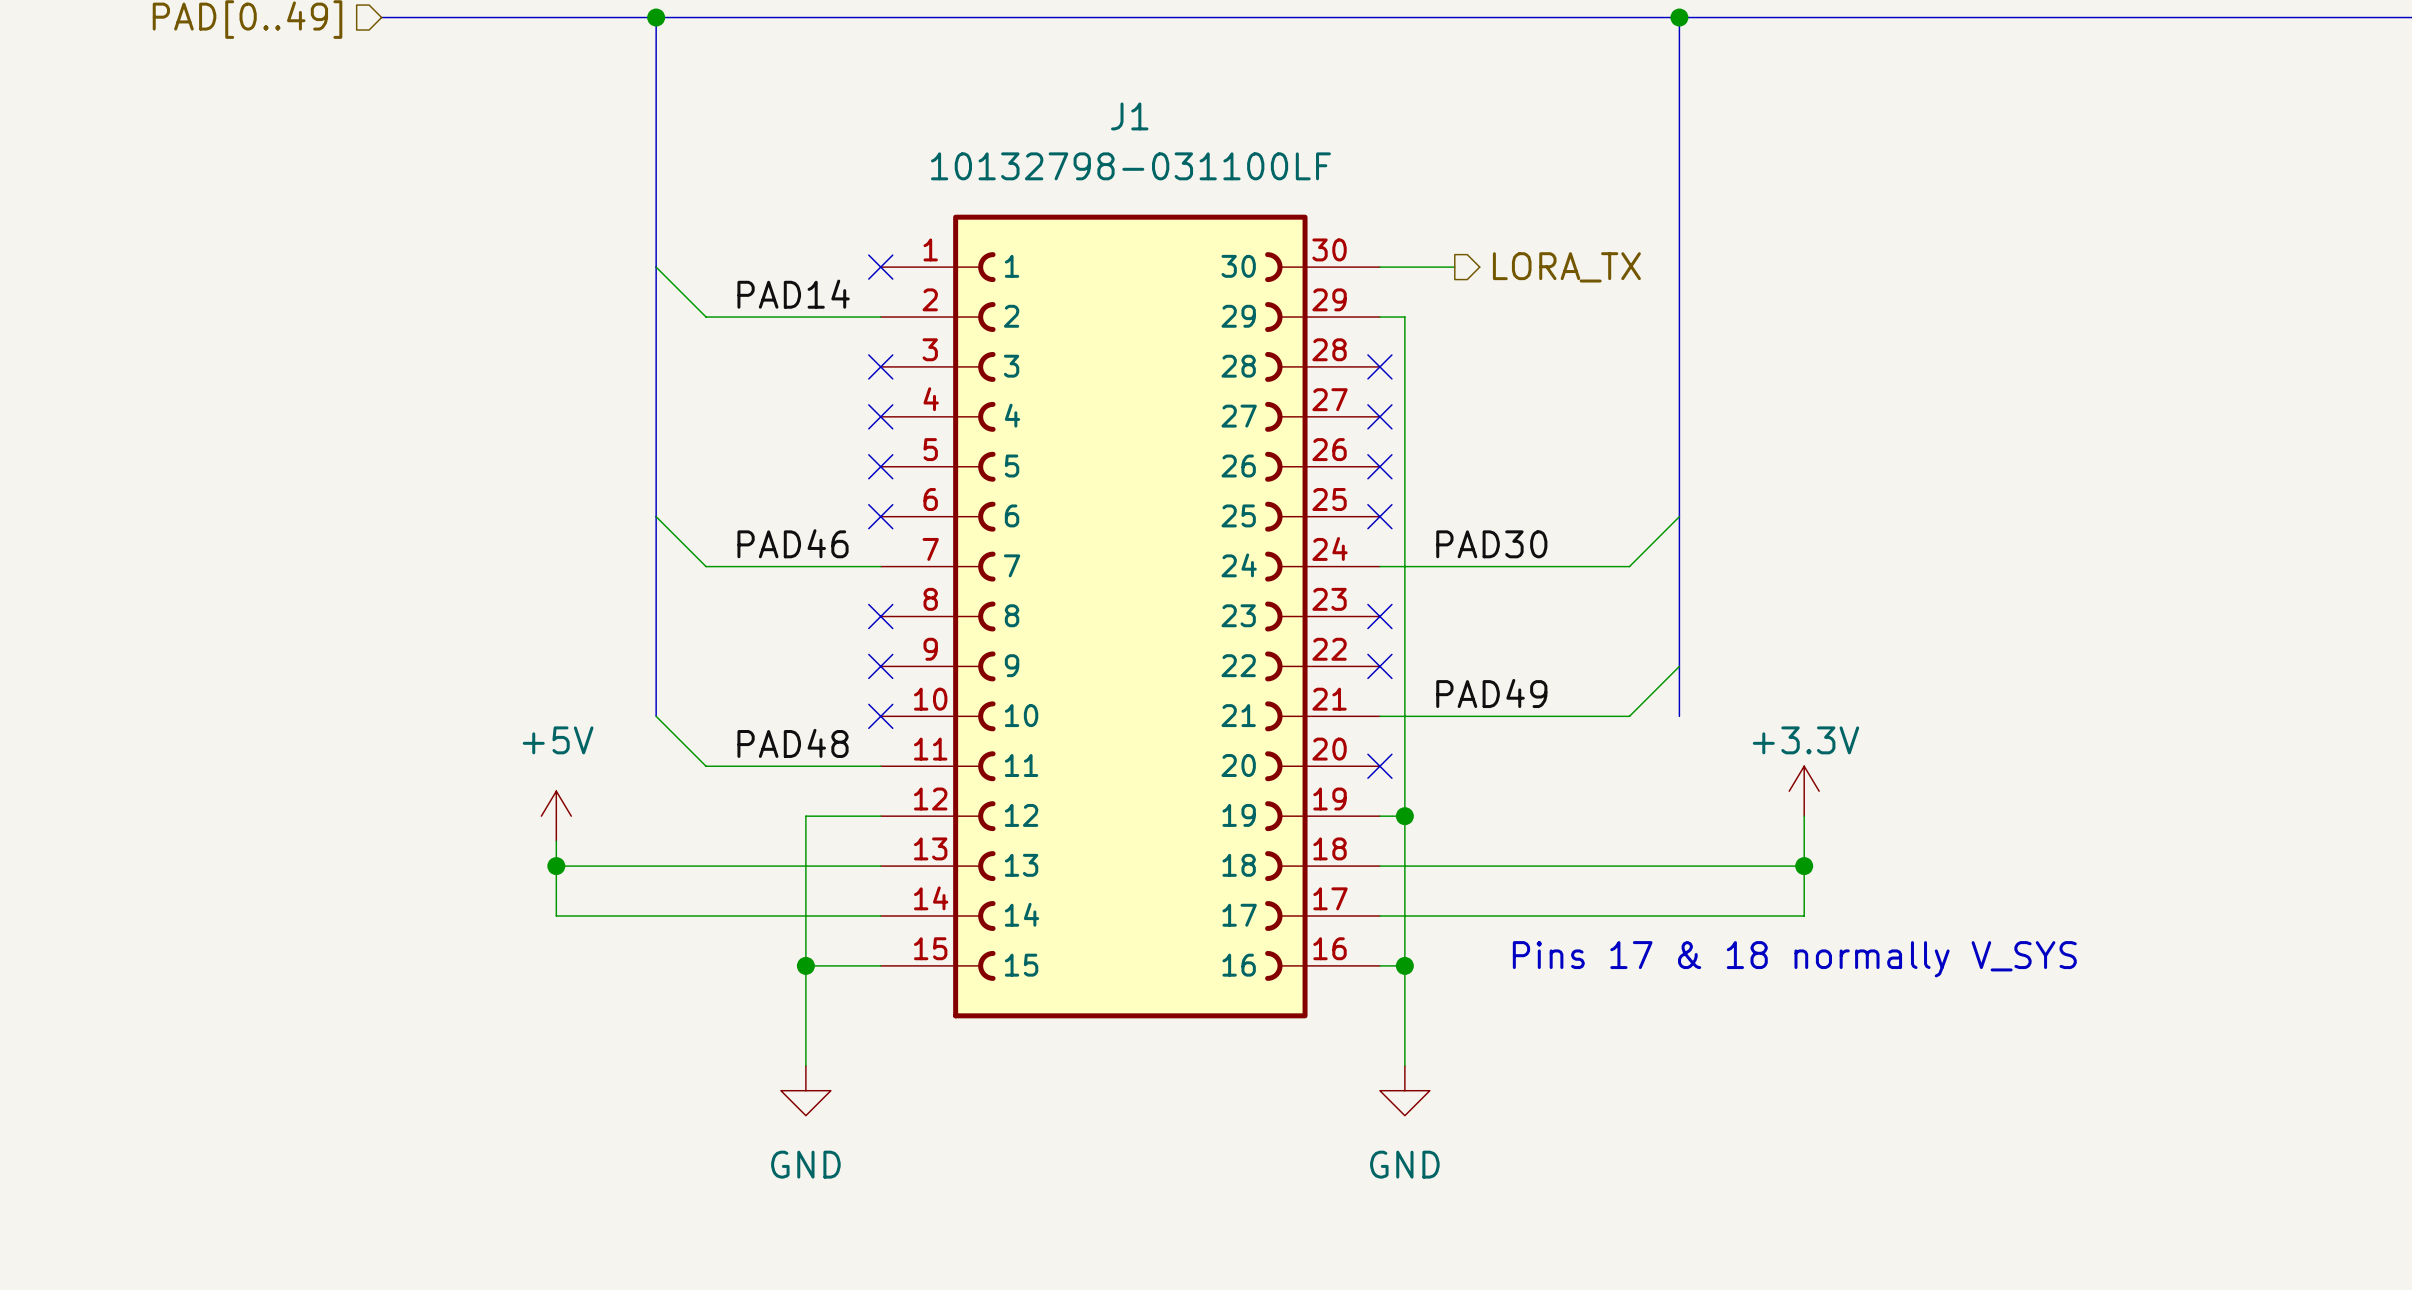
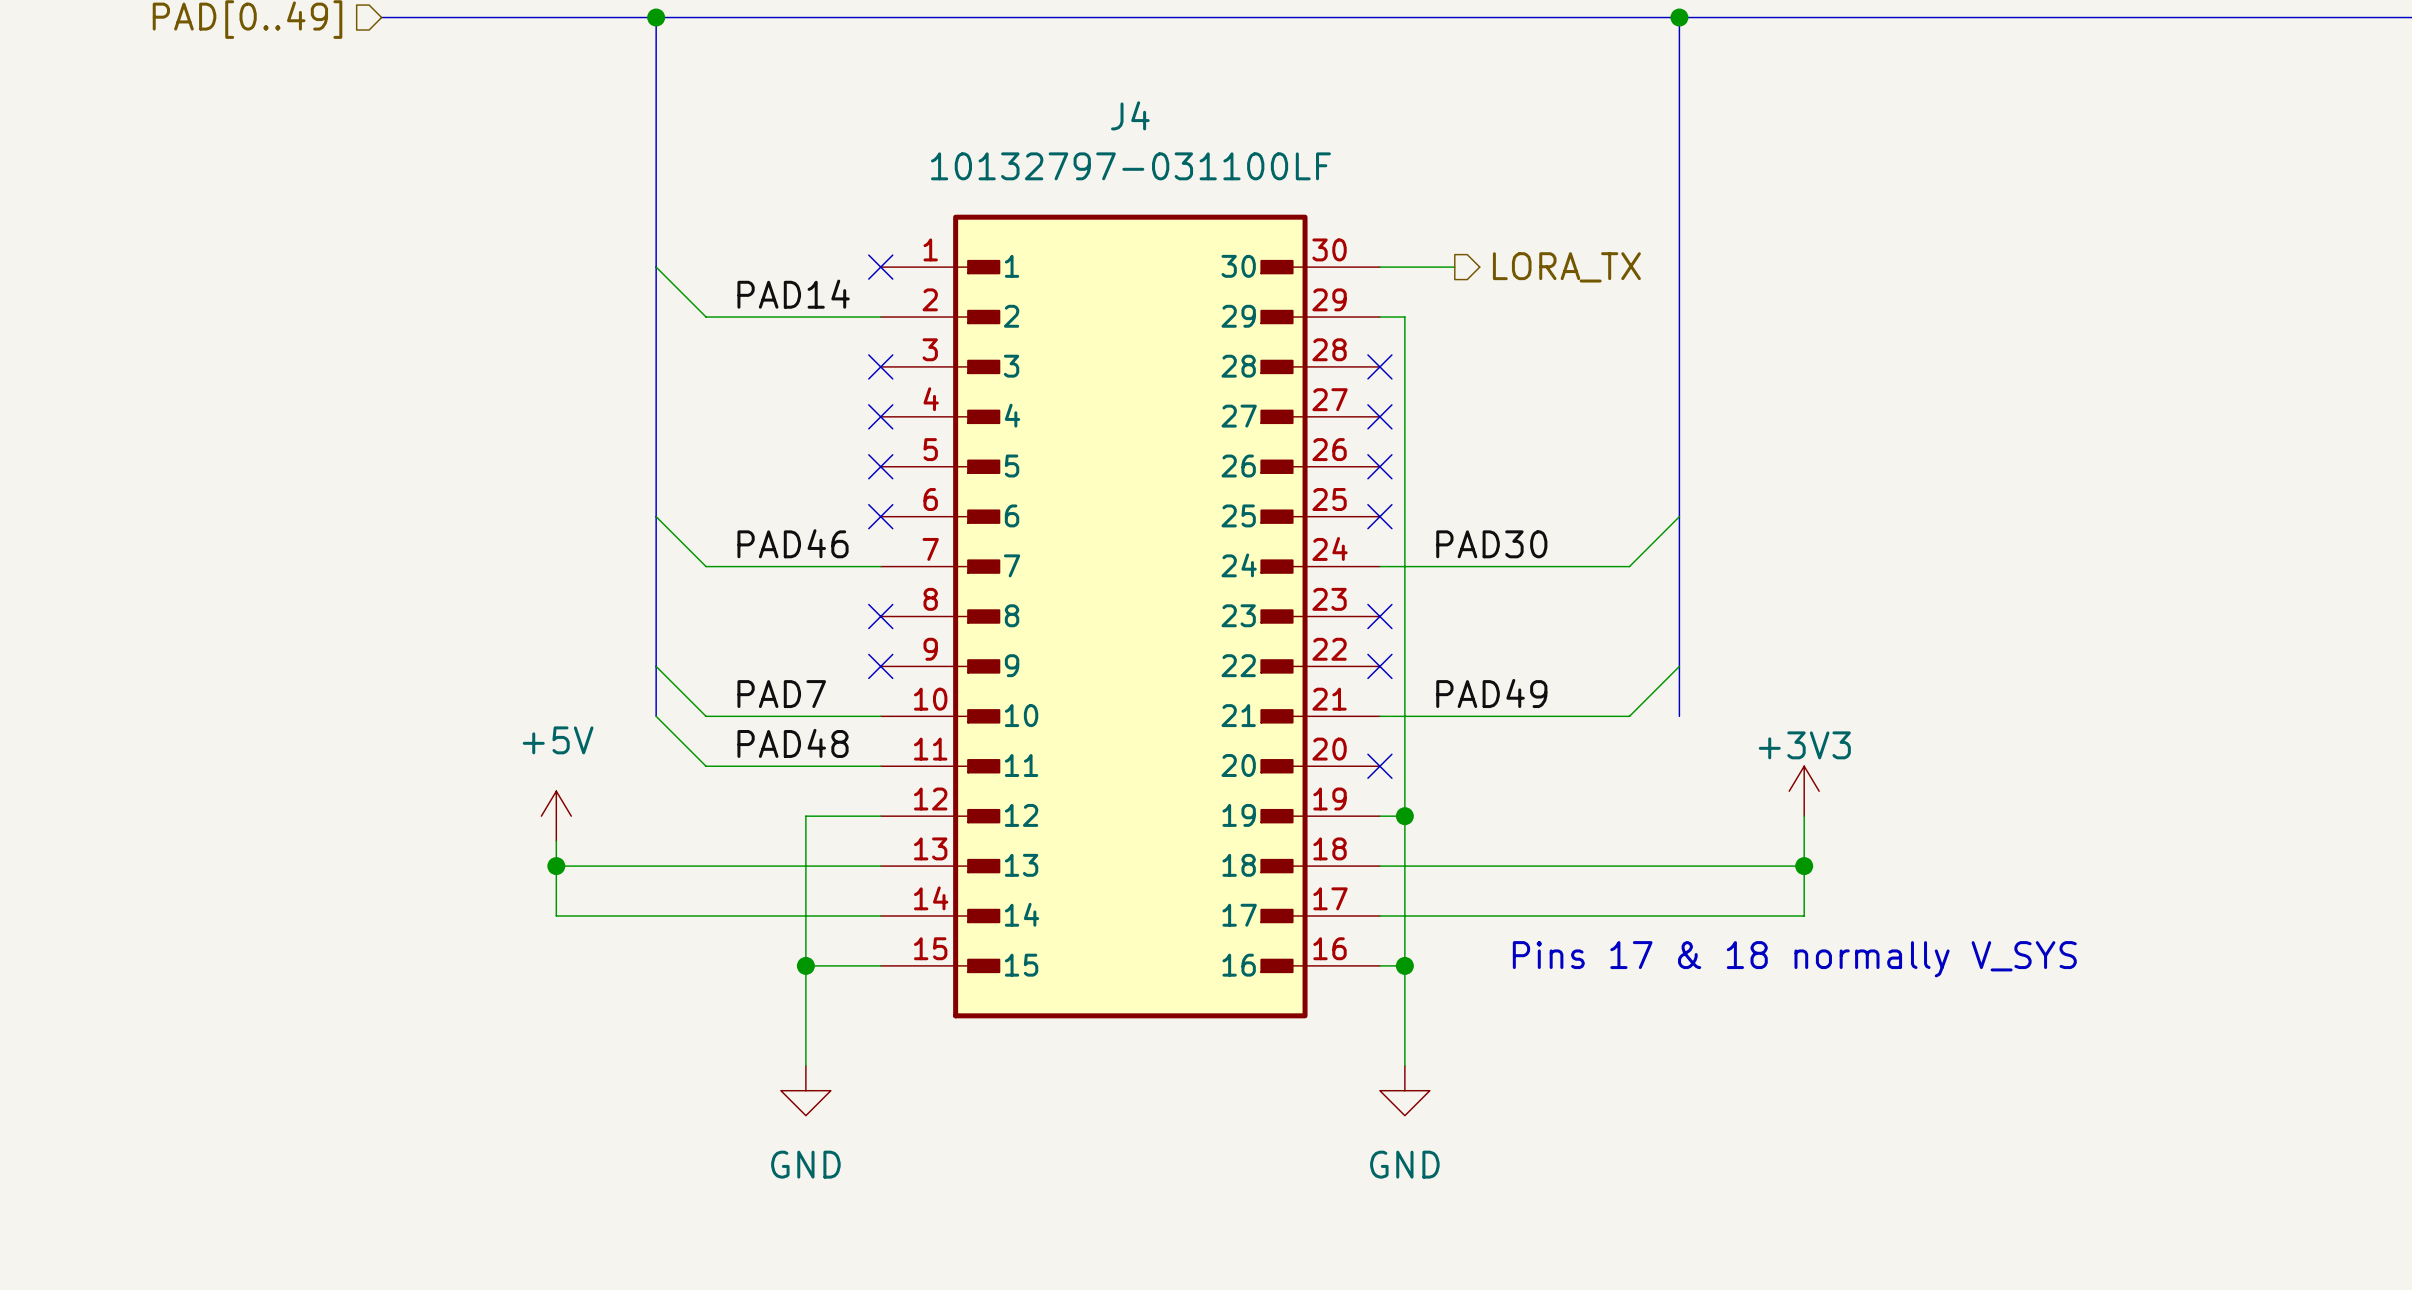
J1: 10132798-031100LF (1130, 616) -> none
J4: none -> 10132797-031100LF (1130, 616)
wire: none -> (656, 666) (706, 716) (880, 716)
label: none -> PAD7 (781, 694)
no-connect mark: (880, 716) -> none
power symbol: +3.3V (1804, 791) -> +3V3 (1804, 791)

